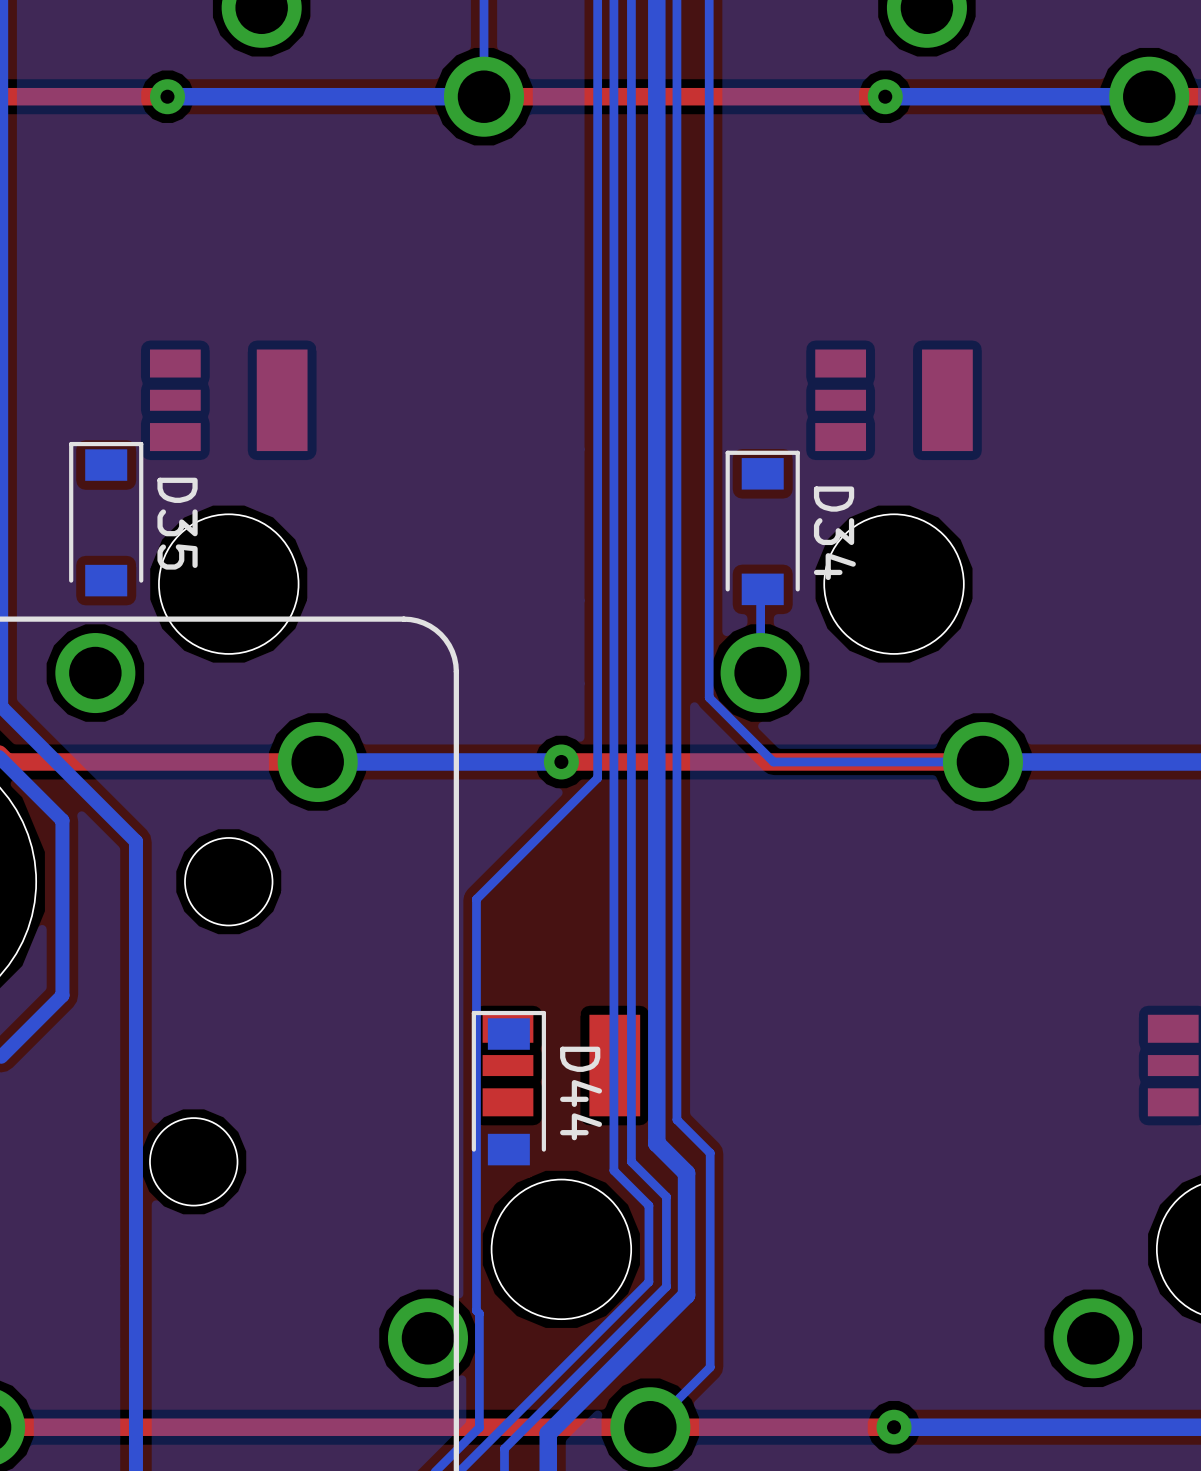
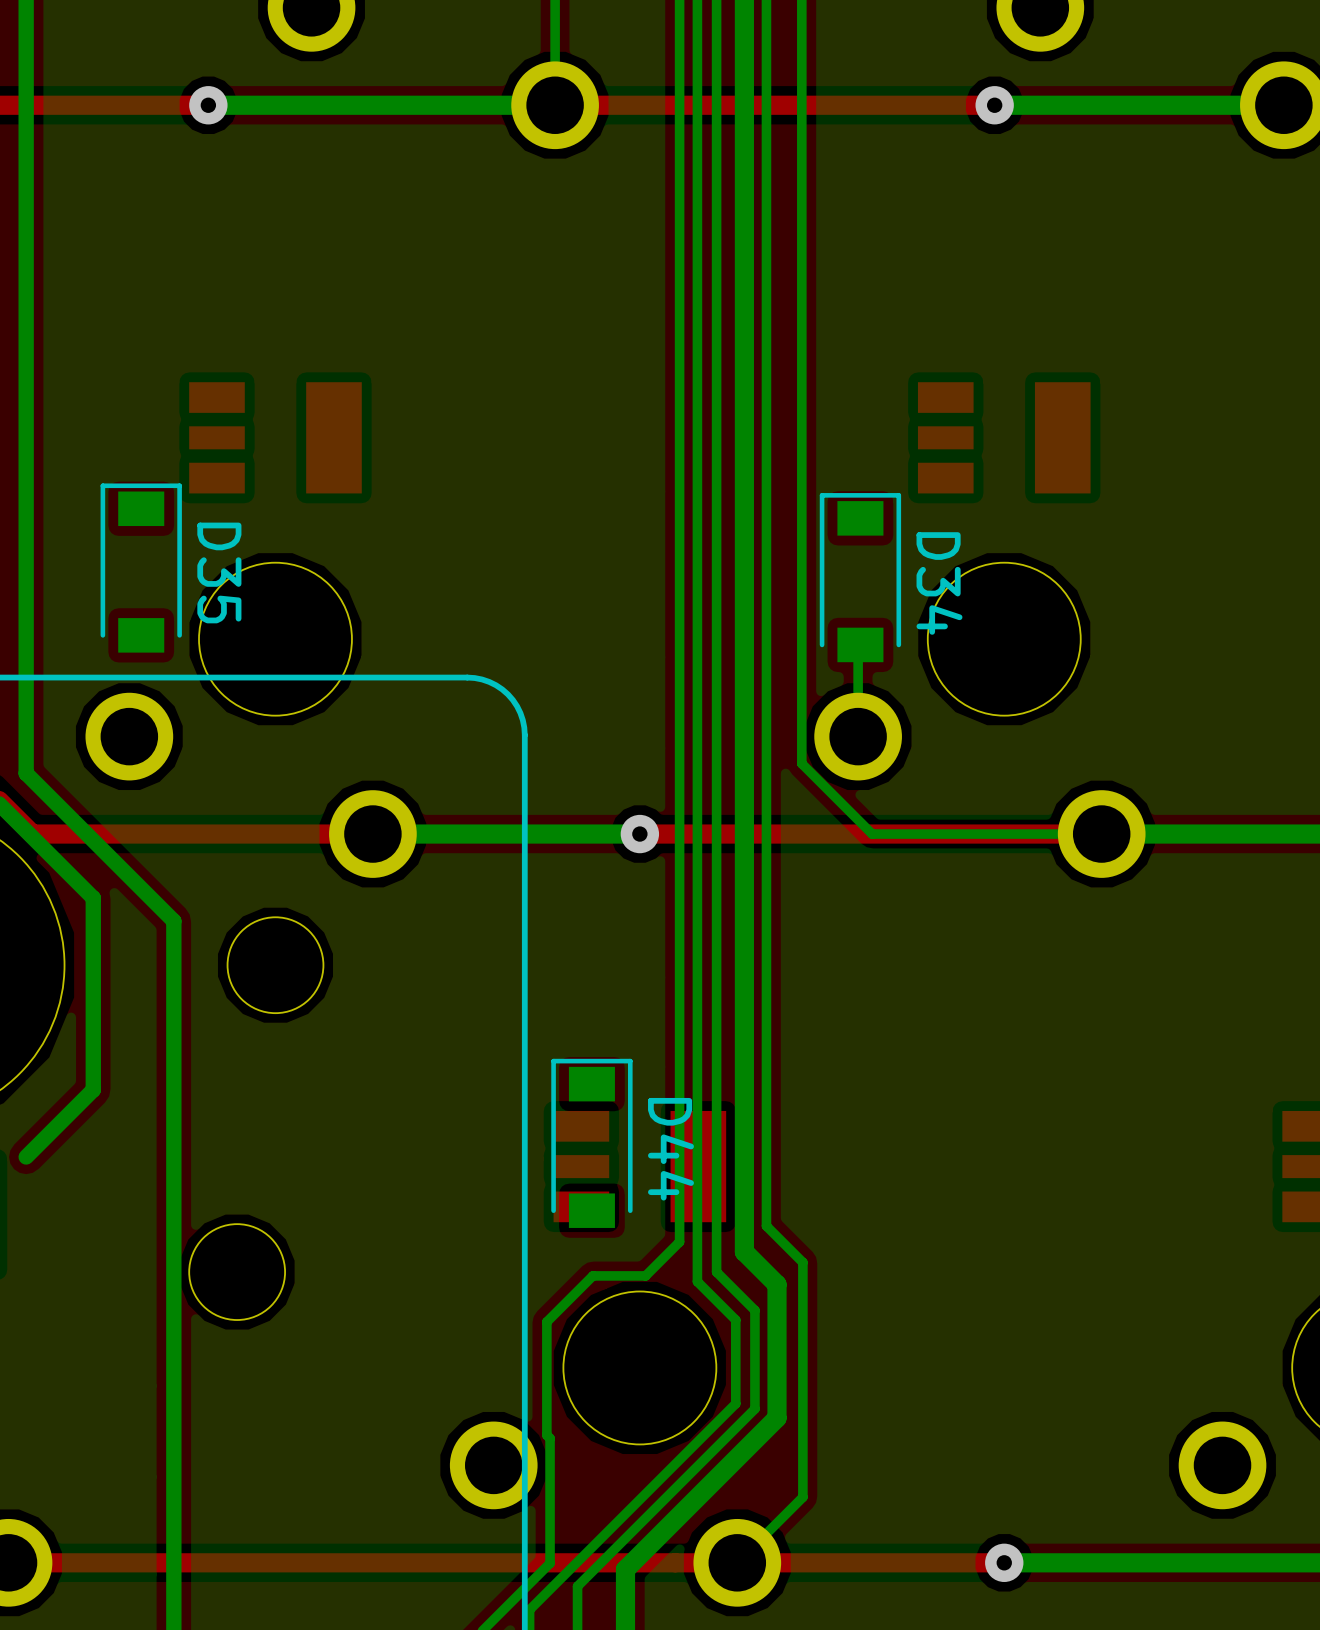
bottom track: (597, 778) (476, 899) (476, 1207) -> (679, 851) (679, 1241) (645, 1275) (592, 1275) (546, 1321)
D44 position: (508, 1088) -> (591, 1143)

